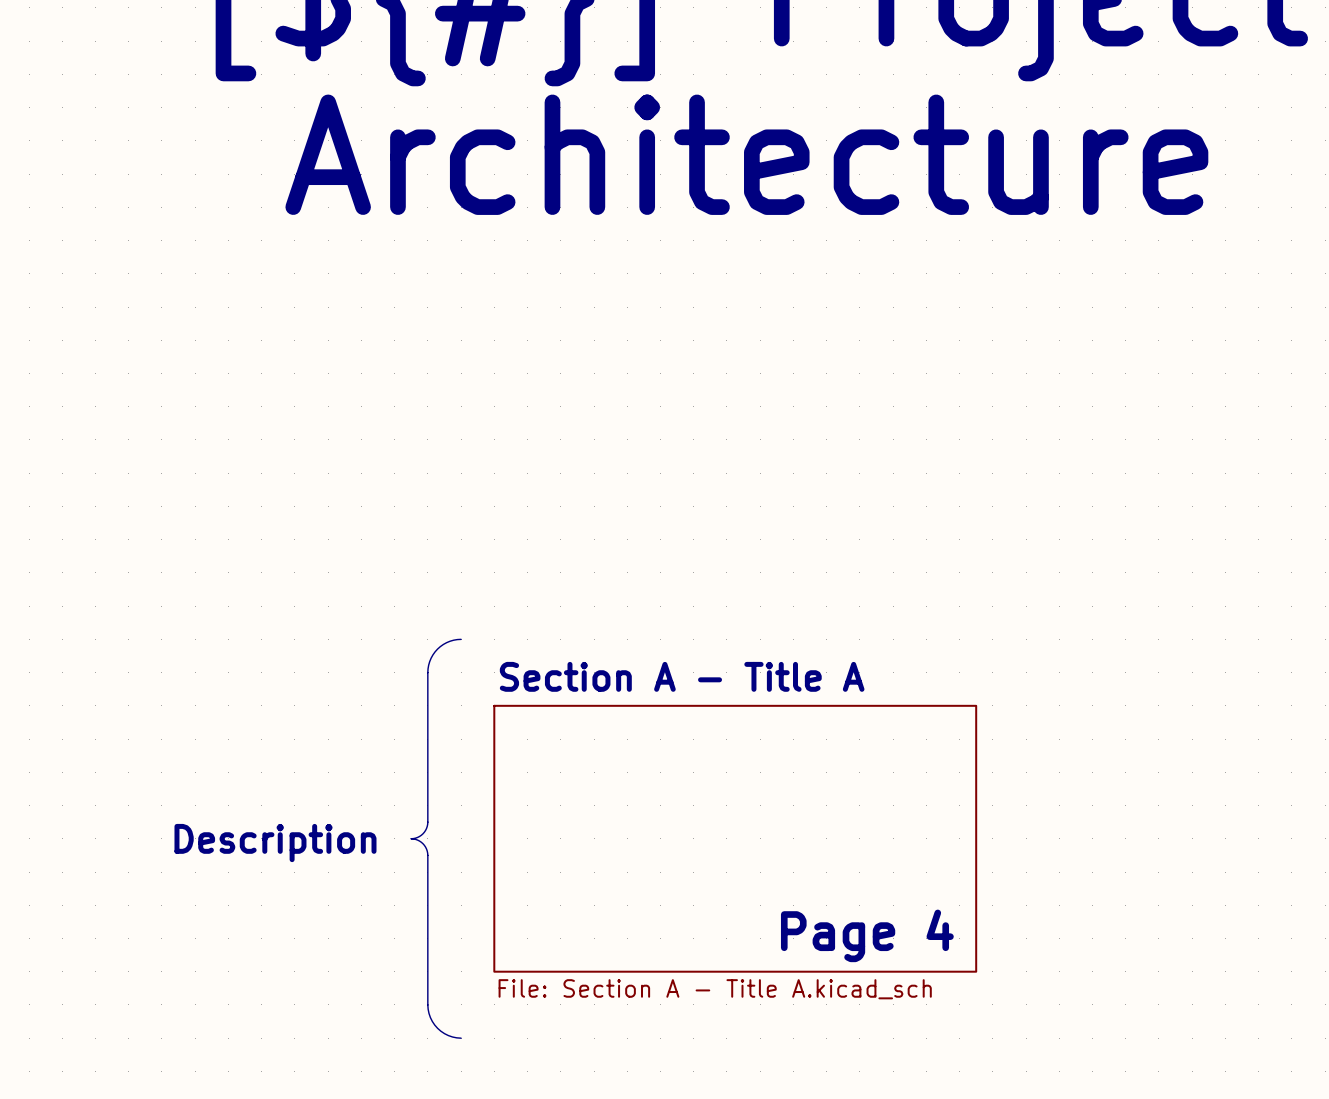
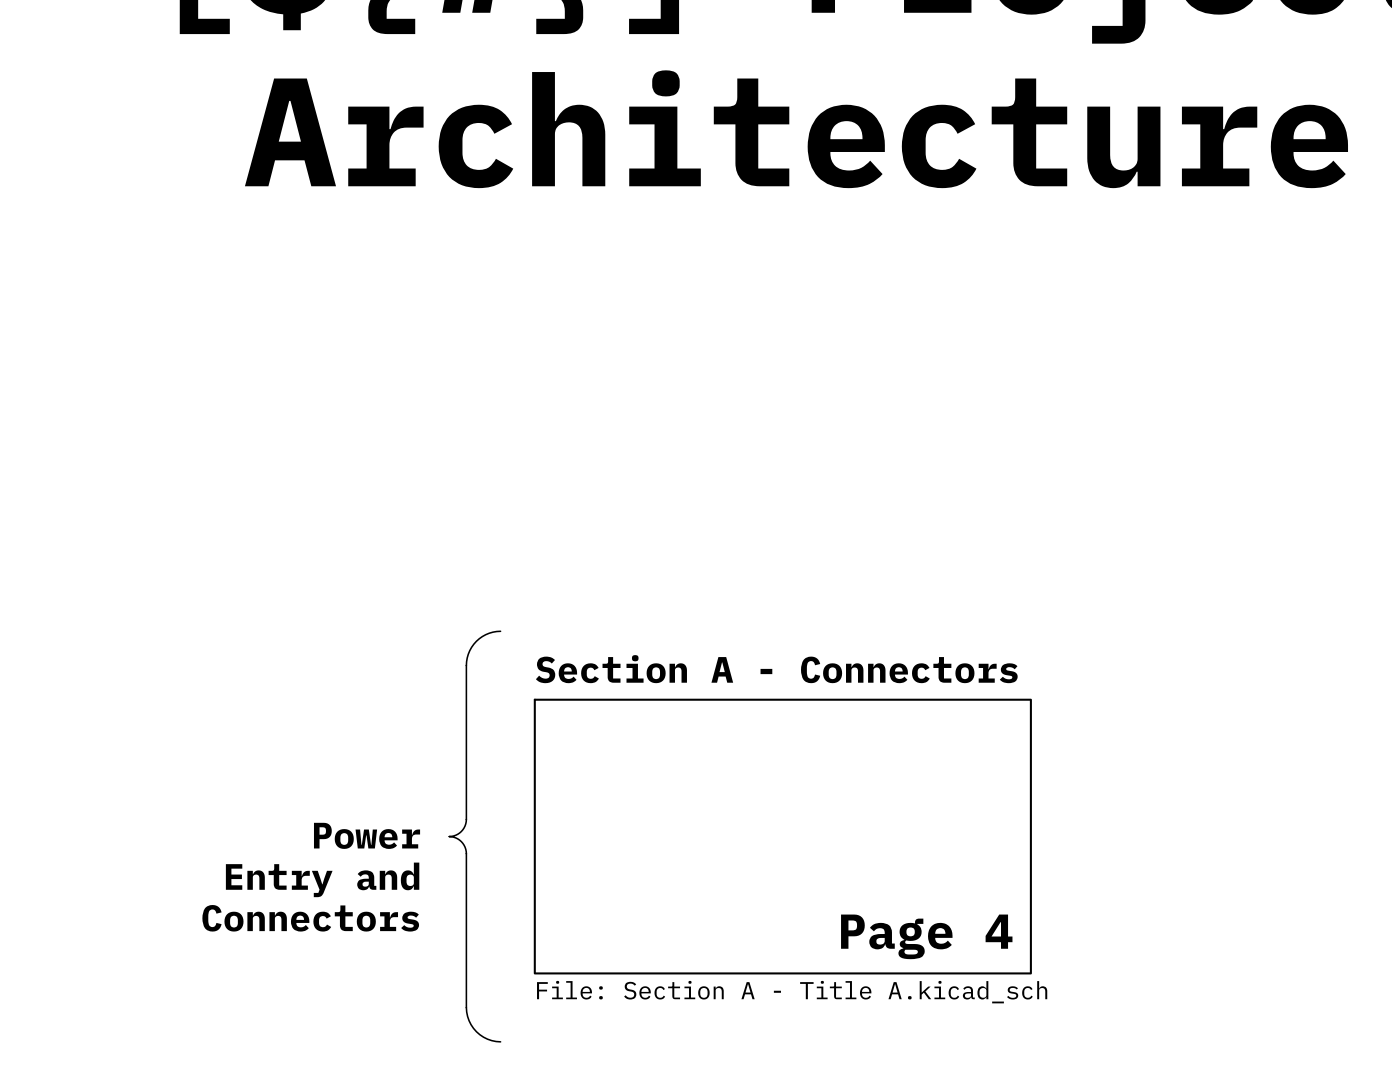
sheet Section A - Title A name: Section A - Title A (682, 676) -> Section A - Connectors (776, 669)
text: Description (275, 843) -> Power (367, 835)
text: none -> Entry and (322, 879)
text: none -> Connectors (310, 918)

